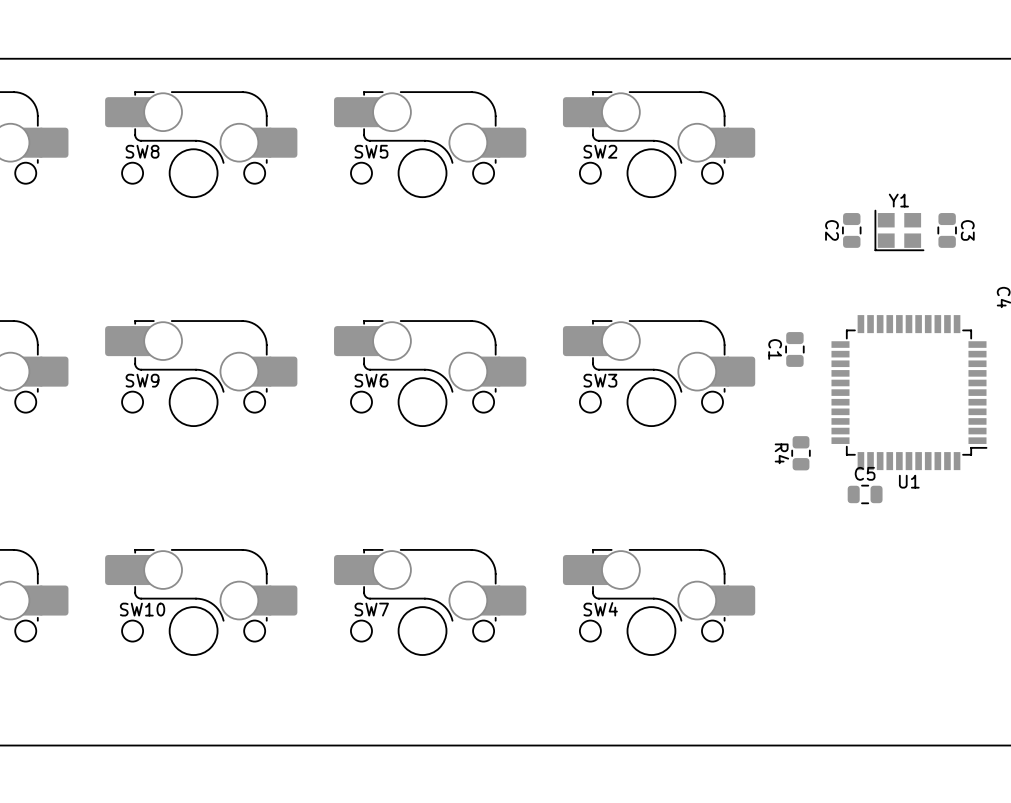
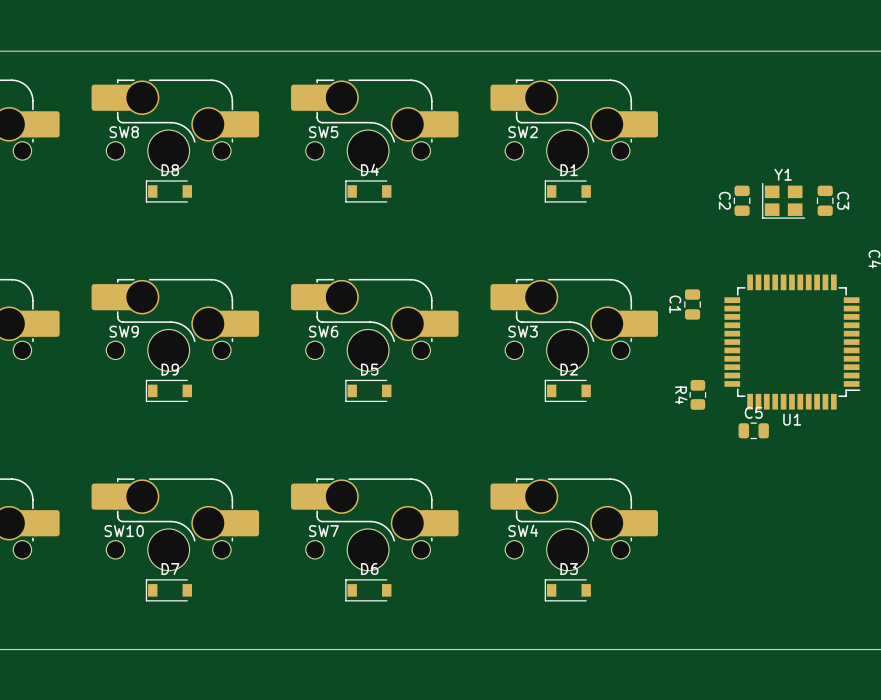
D8: none -> (168, 191)
D4: none -> (368, 191)
D1: none -> (567, 191)
D9: none -> (168, 390)
D5: none -> (368, 390)
D2: none -> (567, 390)
D7: none -> (168, 590)
D6: none -> (368, 590)
D3: none -> (567, 590)

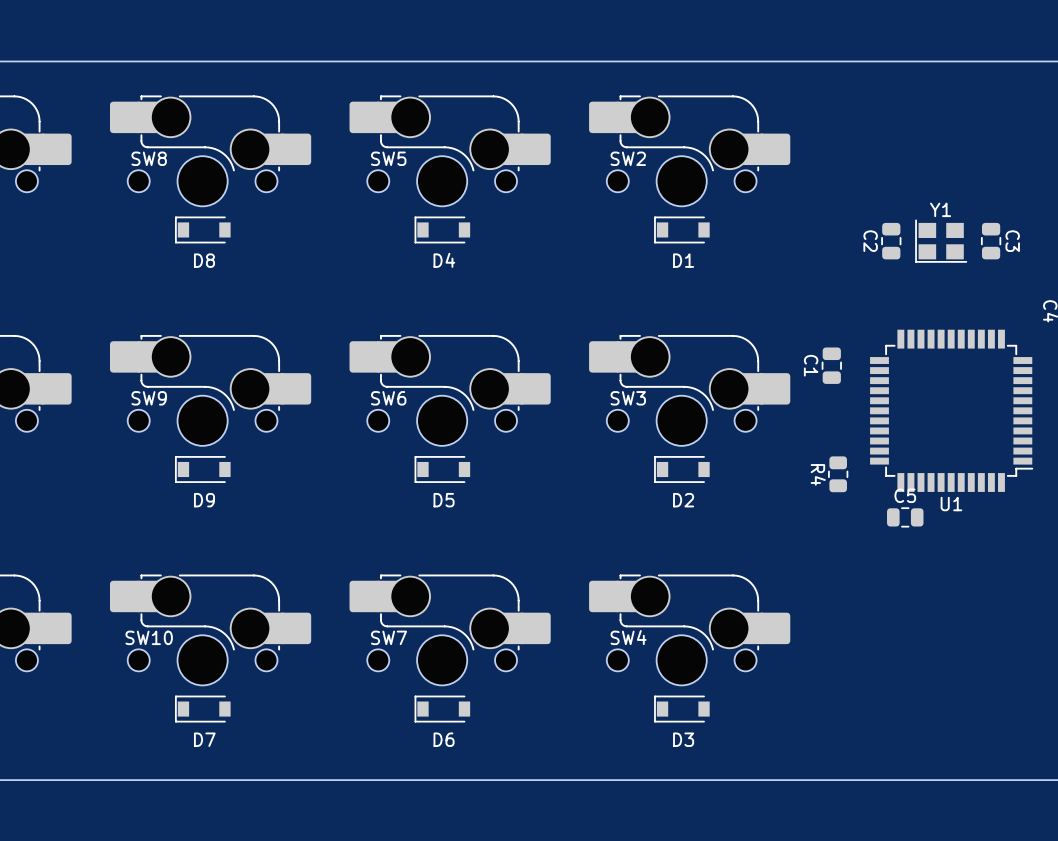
D4 name position: D4 (369, 169) -> D4 (444, 260)
D8 name position: D8 (170, 170) -> D8 (204, 260)
D1 name position: D1 (569, 170) -> D1 (683, 260)
D9 name position: D9 (170, 369) -> D9 (204, 500)
D5 name position: D5 (369, 369) -> D5 (444, 500)
D2 name position: D2 (569, 369) -> D2 (683, 500)
D7 name position: D7 (170, 569) -> D7 (204, 739)
D6 name position: D6 (369, 569) -> D6 (444, 739)
D3 name position: D3 (569, 569) -> D3 (683, 739)

